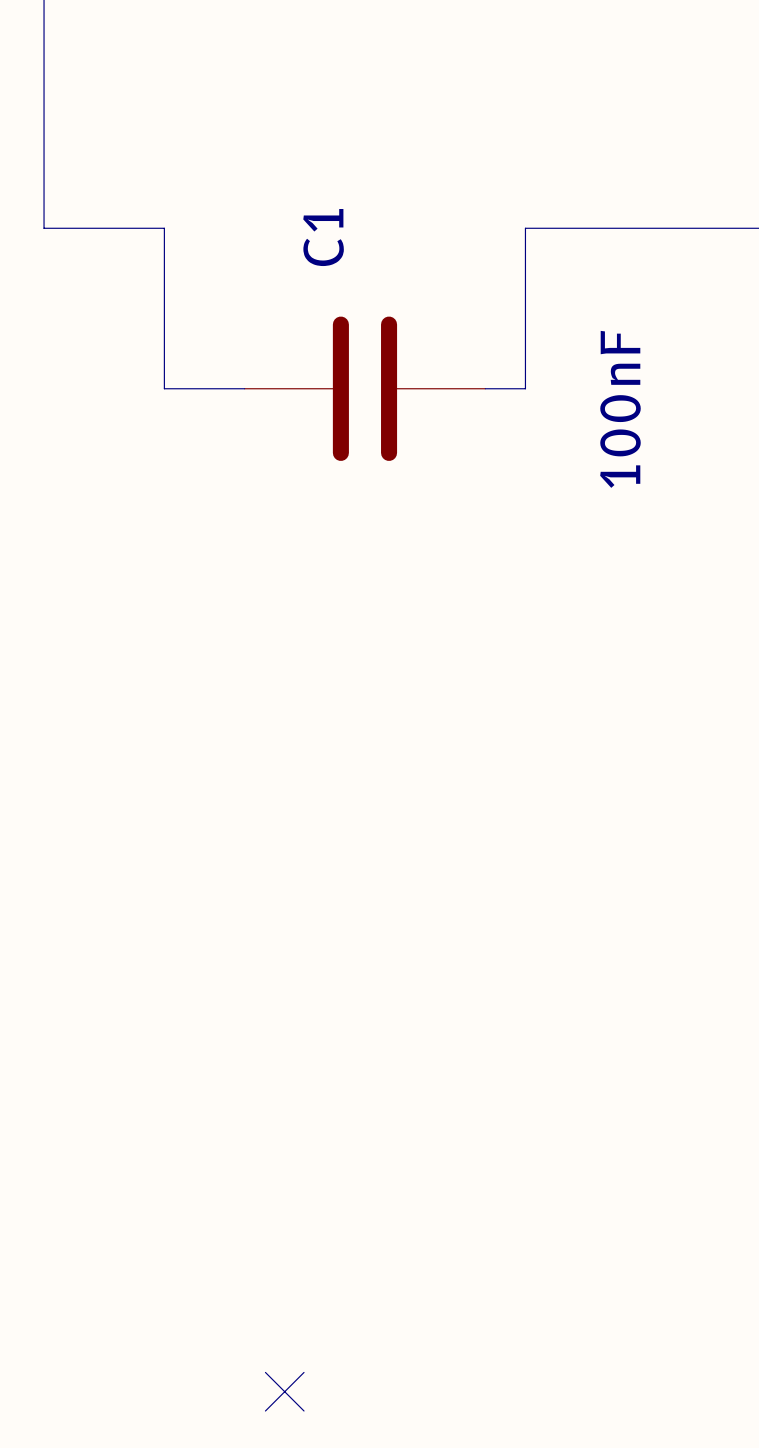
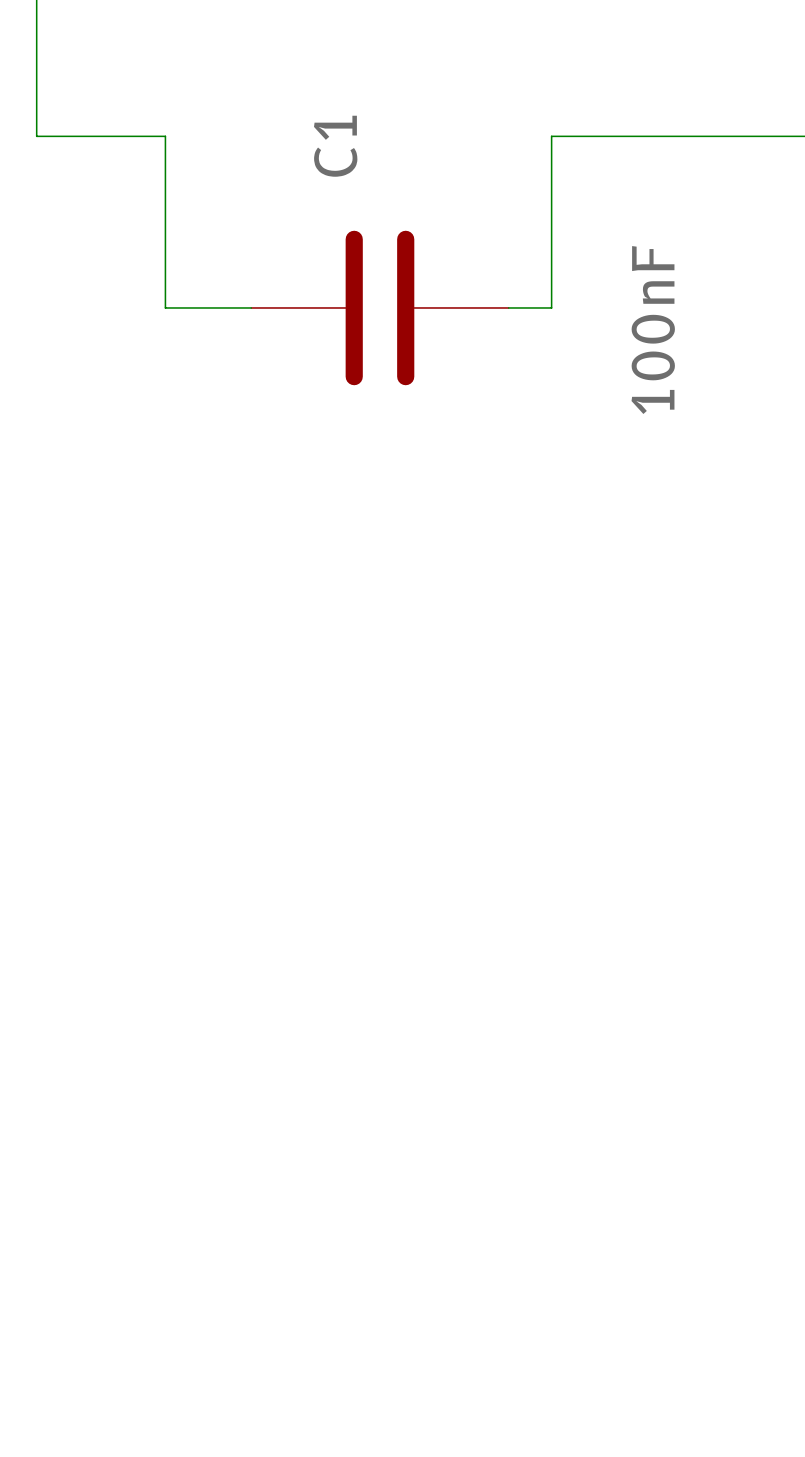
no-connect mark: (284, 1391) -> none

